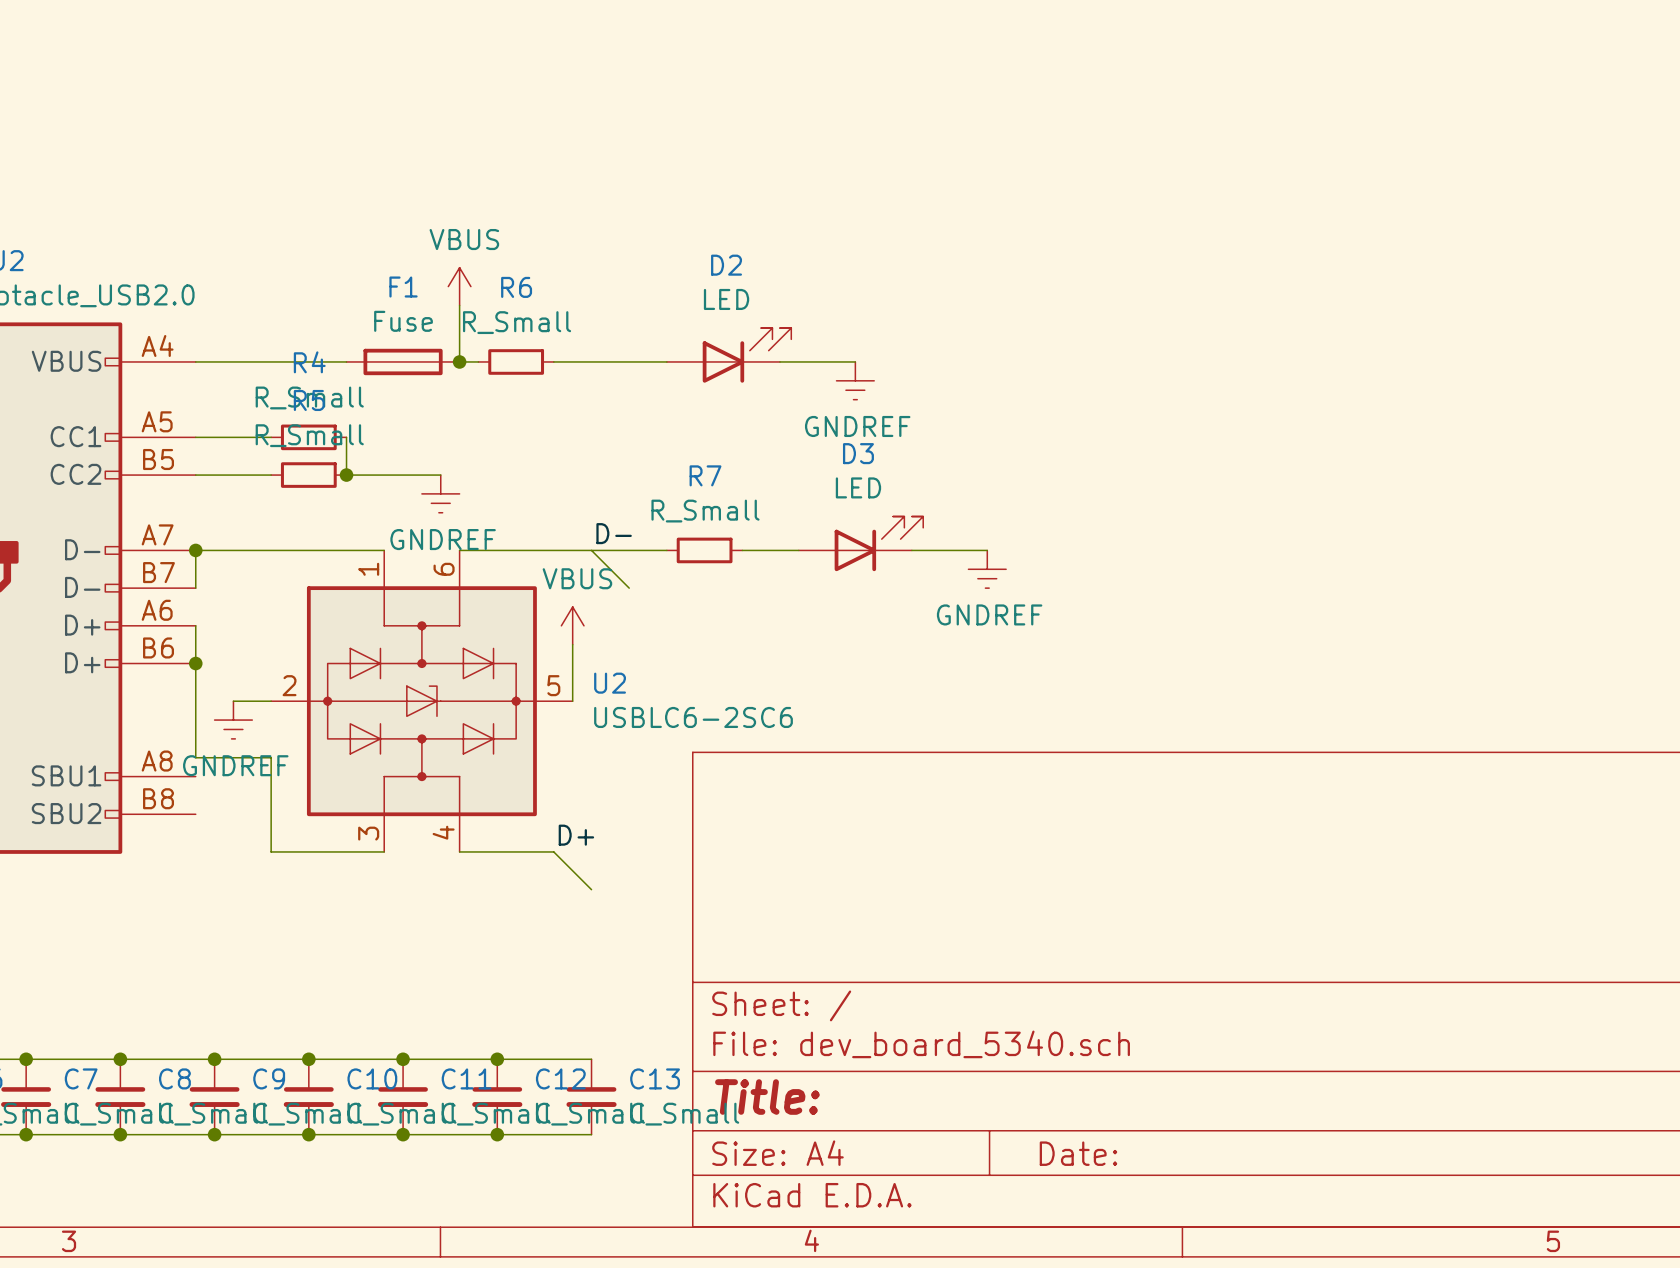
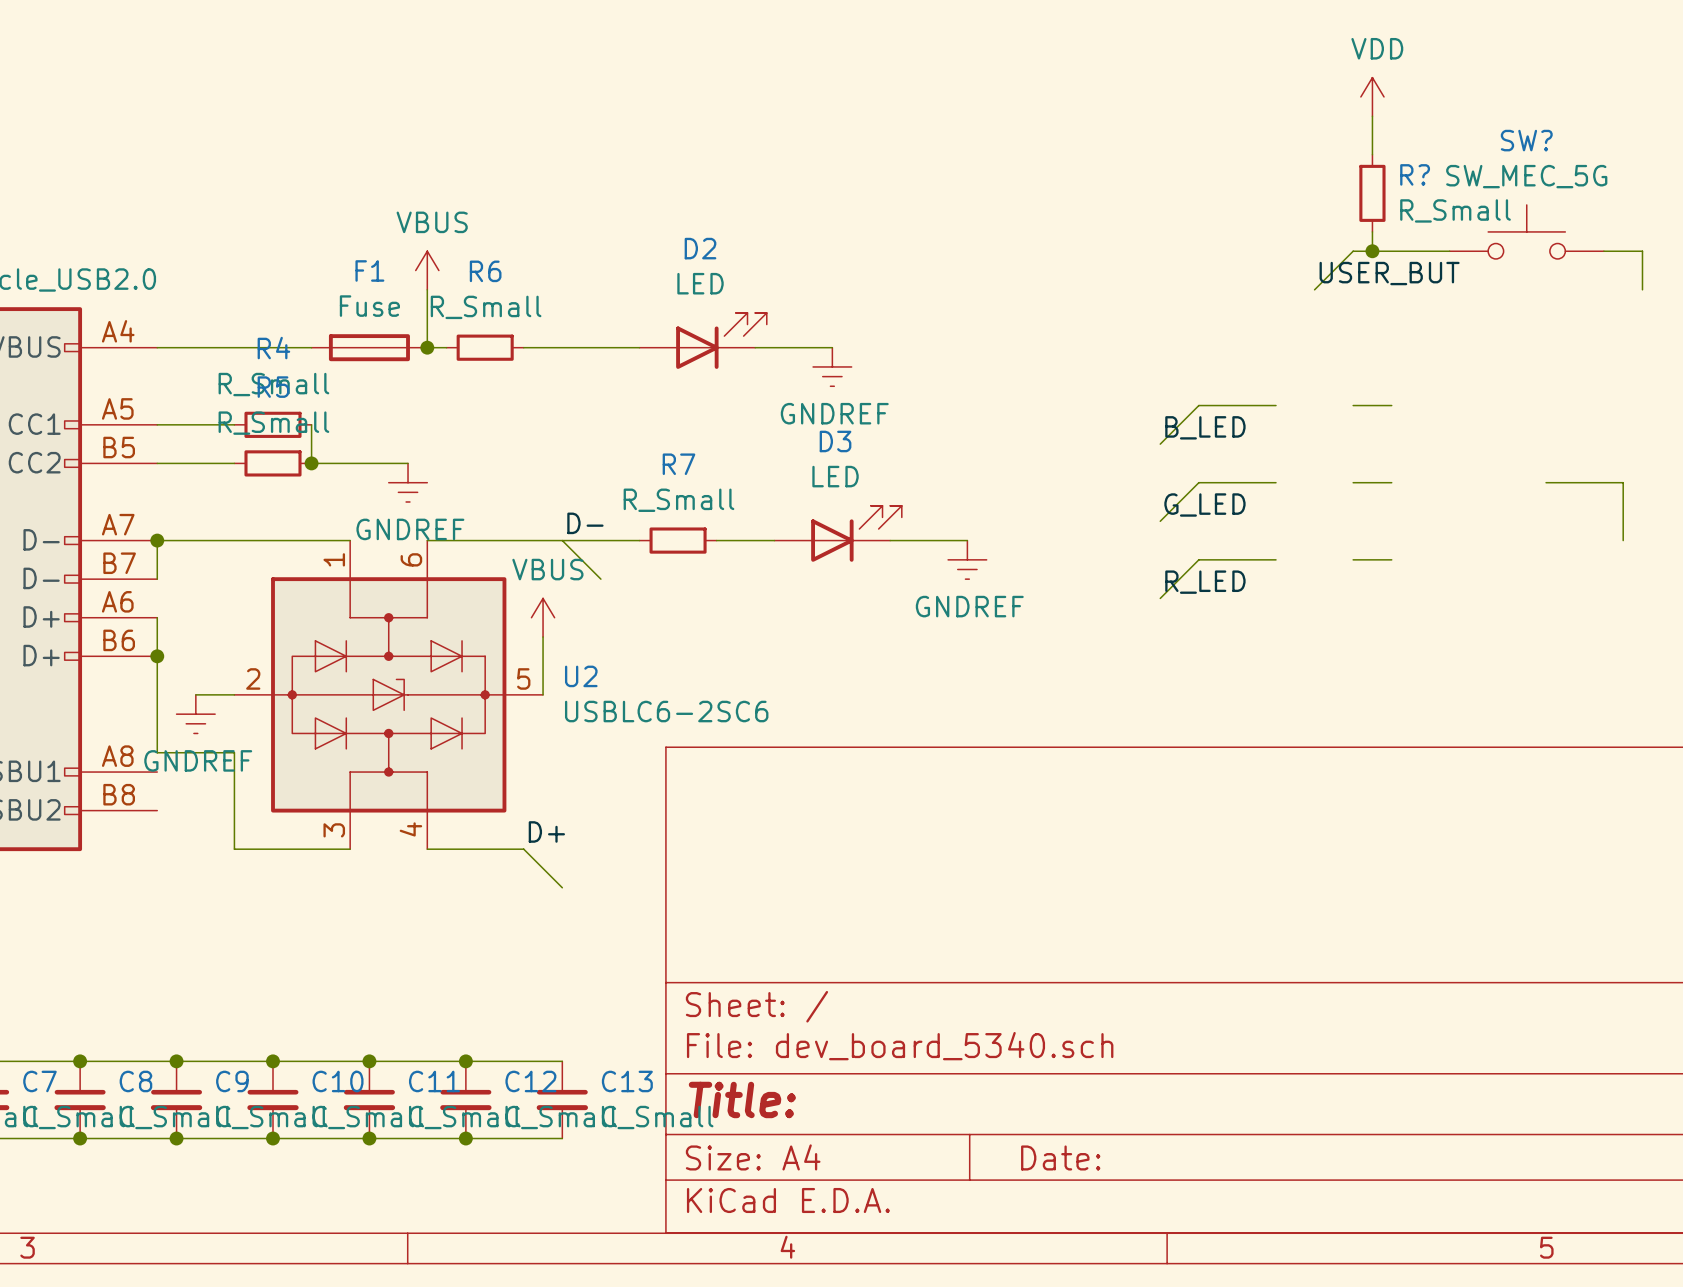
power symbol: none -> VDD (1372, 96)
wire: none -> (1372, 116) (1372, 154)
R?: none -> R_Small (1372, 193)
wire: none -> (1372, 231) (1372, 251)
SW?: none -> SW_MEC_5G (1526, 231)
junction: none -> (1372, 251)
wire: none -> (1449, 251) (1353, 251) (1314, 289)
wire: none -> (1603, 251) (1642, 251) (1642, 289)
label: none -> USER_BUT (1389, 273)
wire: none -> (1276, 405) (1198, 405) (1160, 444)
wire: none -> (1353, 405) (1391, 405)
label: none -> B_LED (1205, 427)
wire: none -> (1276, 482) (1198, 482) (1160, 521)
wire: none -> (1353, 482) (1391, 482)
wire: none -> (1546, 482) (1623, 482) (1623, 540)
label: none -> G_LED (1204, 504)
wire: none -> (1276, 559) (1198, 559) (1160, 598)
wire: none -> (1353, 559) (1391, 559)
label: none -> R_LED (1205, 582)

